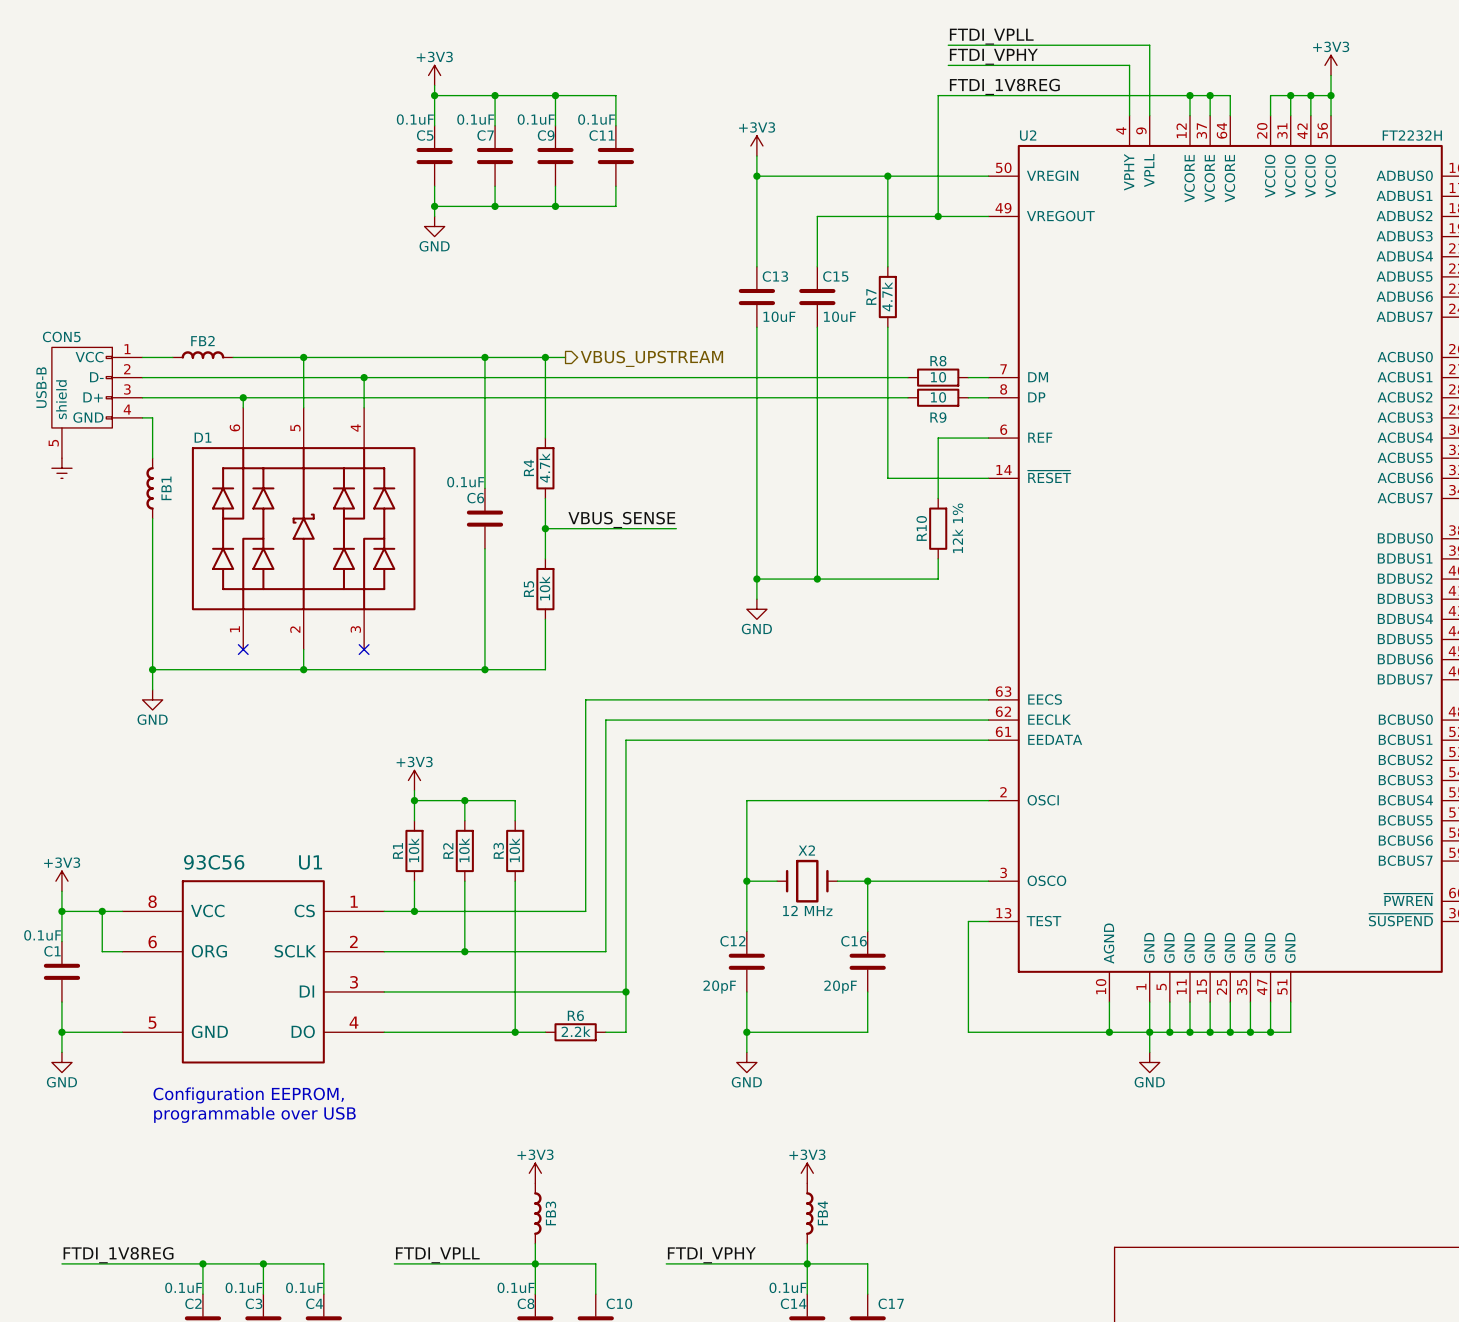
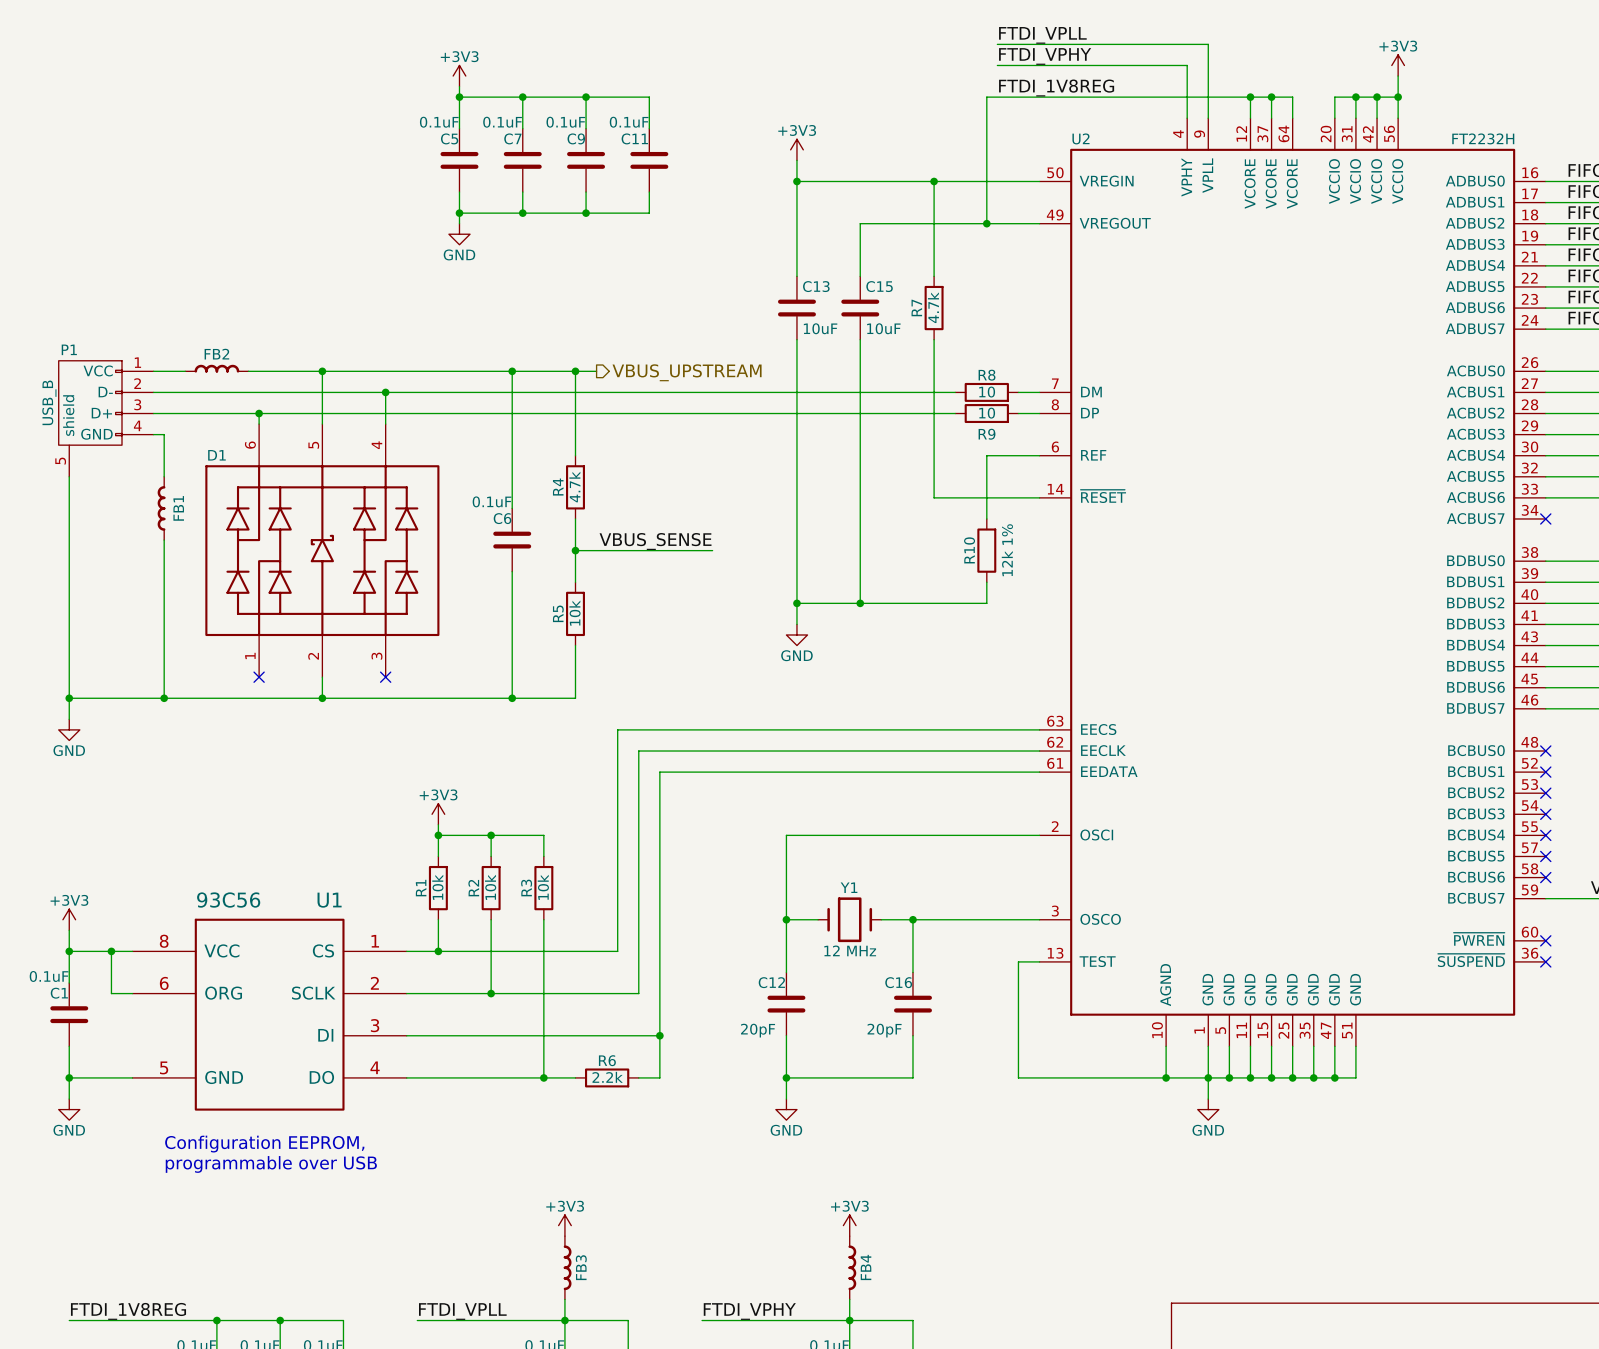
CON5 name: CON5 (61, 336) -> P1 (69, 349)
CON5 value: USB-B (41, 387) -> USB_B (49, 402)
wire: none -> (69, 476) (69, 719)
power symbol: (61, 468) -> none
junction: none -> (69, 698)
wire: (152, 669) (152, 689) -> (164, 698) (69, 698)
power symbol position: GND (152, 699) -> GND (69, 729)
X2 name: X2 (806, 850) -> Y1 (849, 887)

